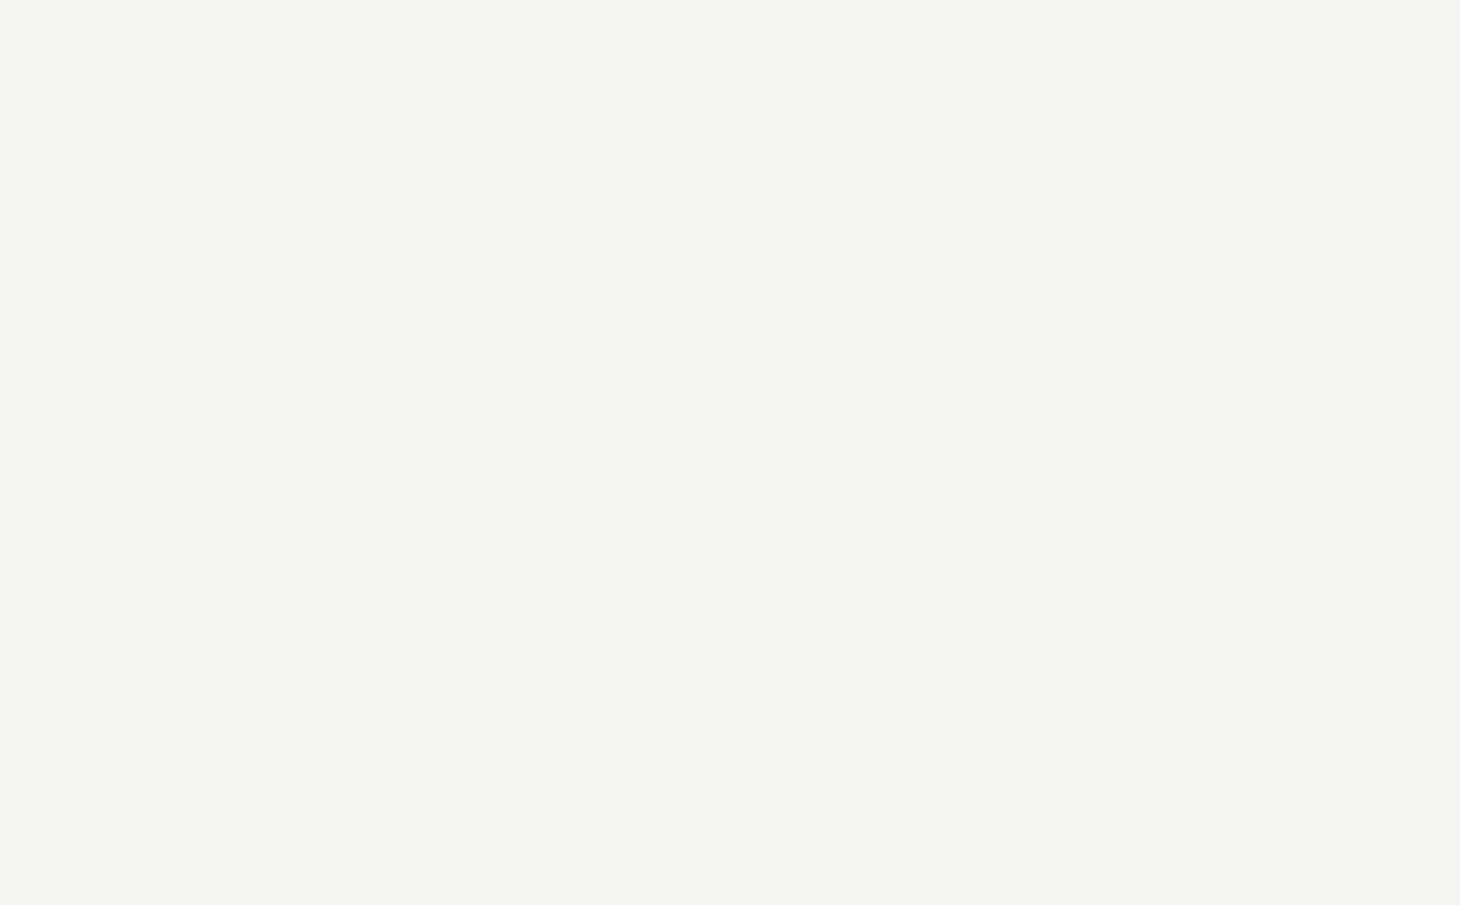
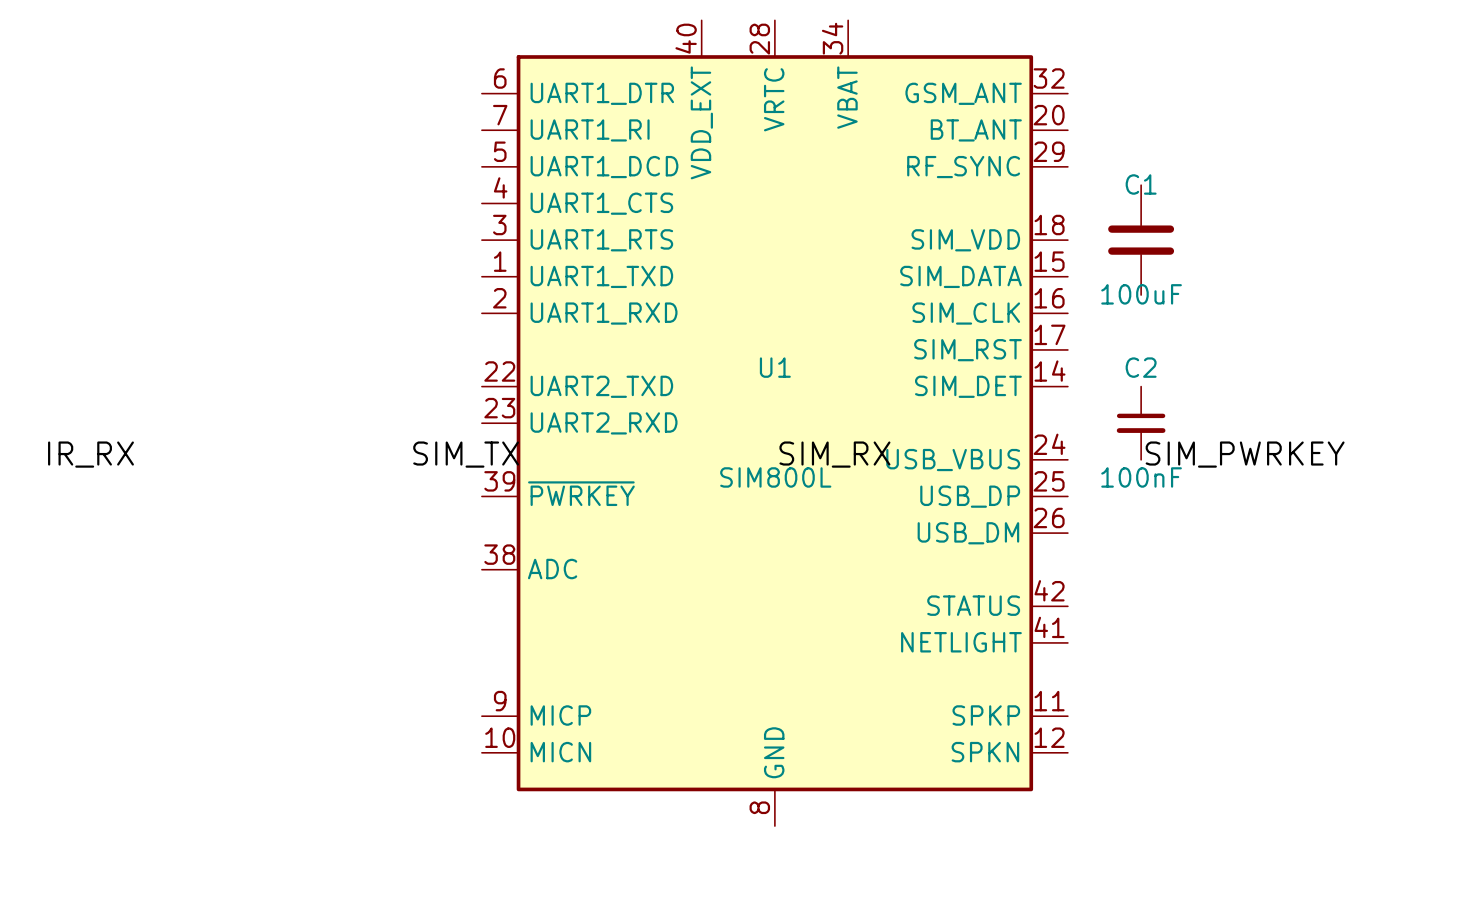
C1: none -> 100uF (1141, 240)
U1: none -> SIM800L (774, 423)
C2: none -> 100nF (1141, 423)
label: none -> IR_RX (90, 454)
label: none -> SIM_TX (466, 454)
label: none -> SIM_RX (834, 454)
label: none -> SIM_PWRKEY (1245, 454)

